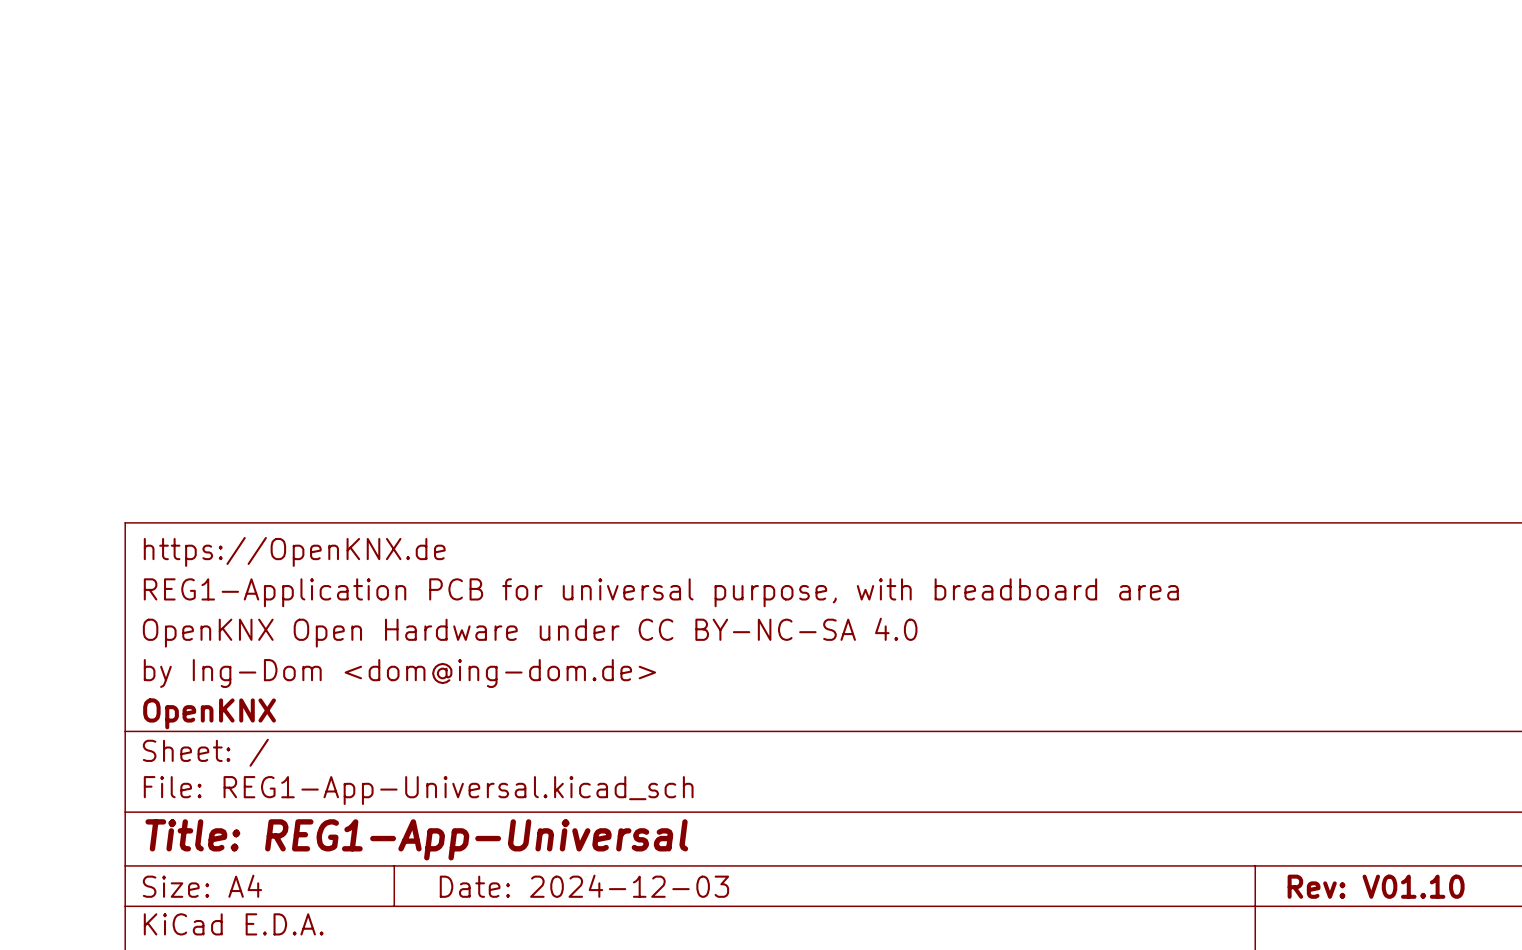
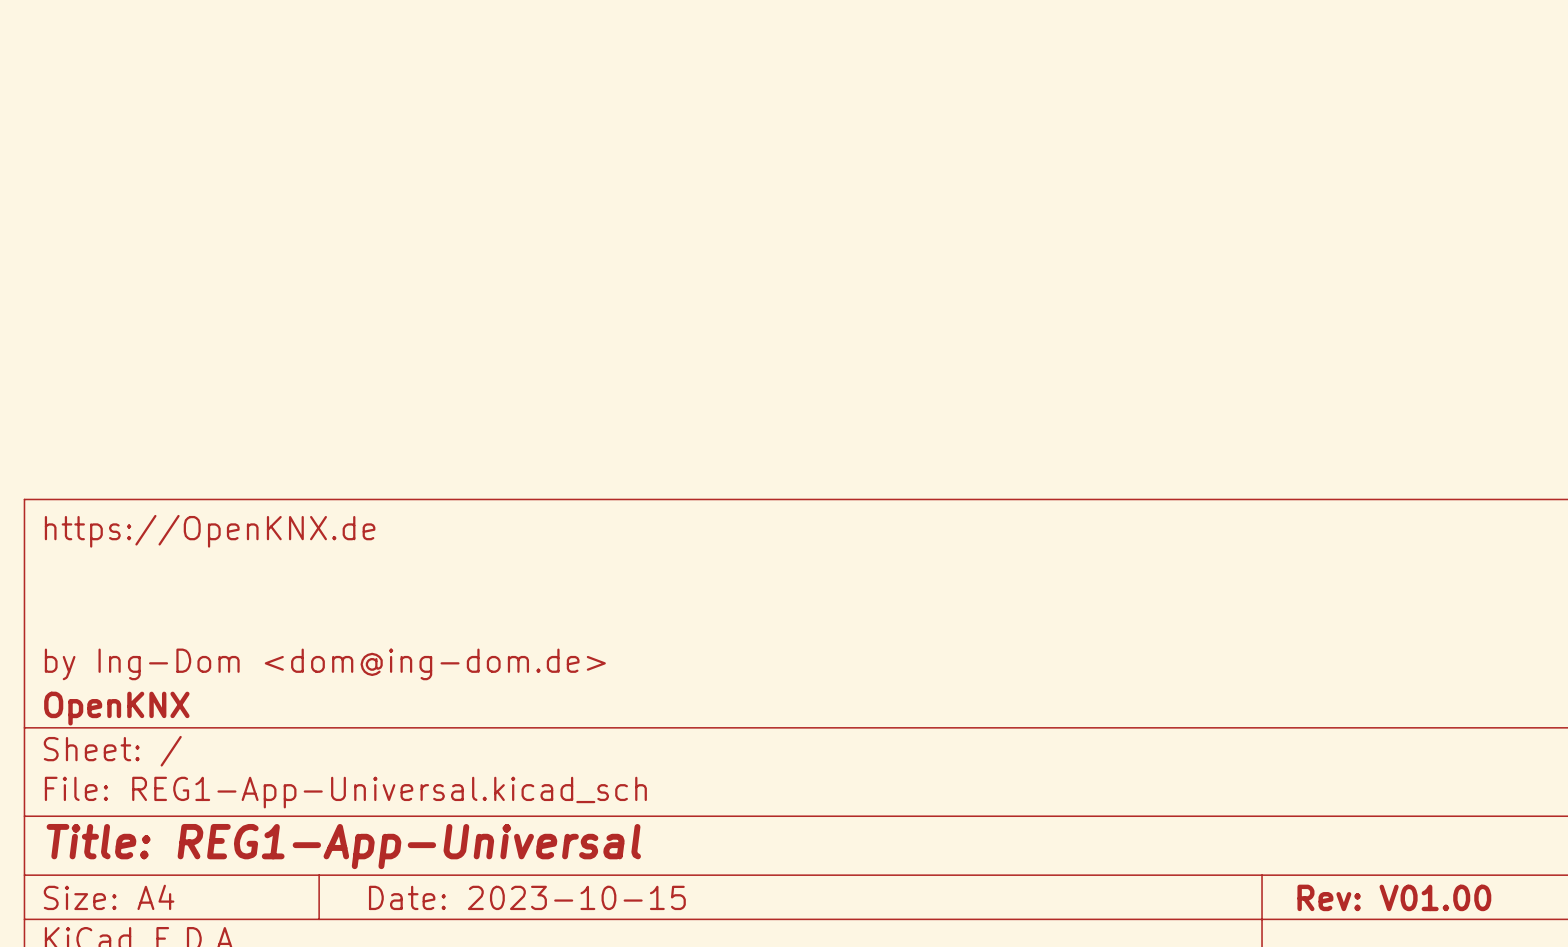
title block: REG1-Application PCB for universal purpose, with breadboard area (661, 592) -> none
title block: OpenKNX Open Hardware under CC BY-NC-SA 4.0 (530, 632) -> none
title block: Date: 2024-12-03 (584, 886) -> Date: 2023-10-15 (527, 897)
title block: Rev: V01.10 (1376, 886) -> Rev: V01.00 (1394, 897)

